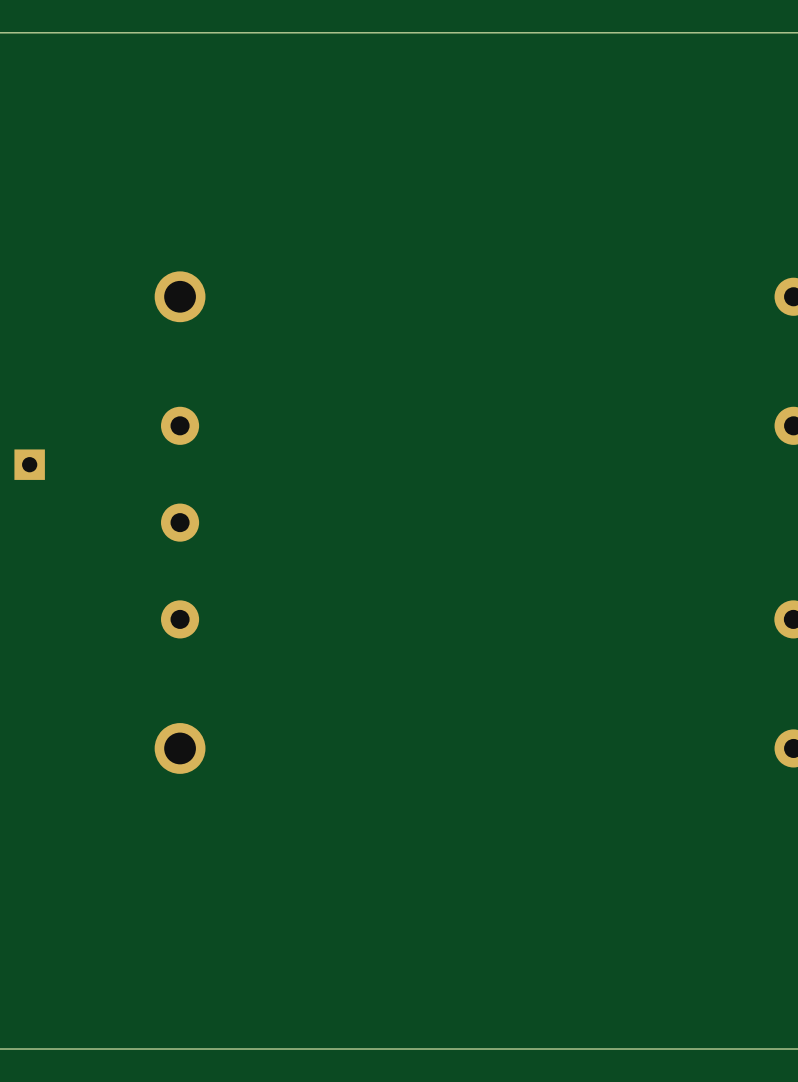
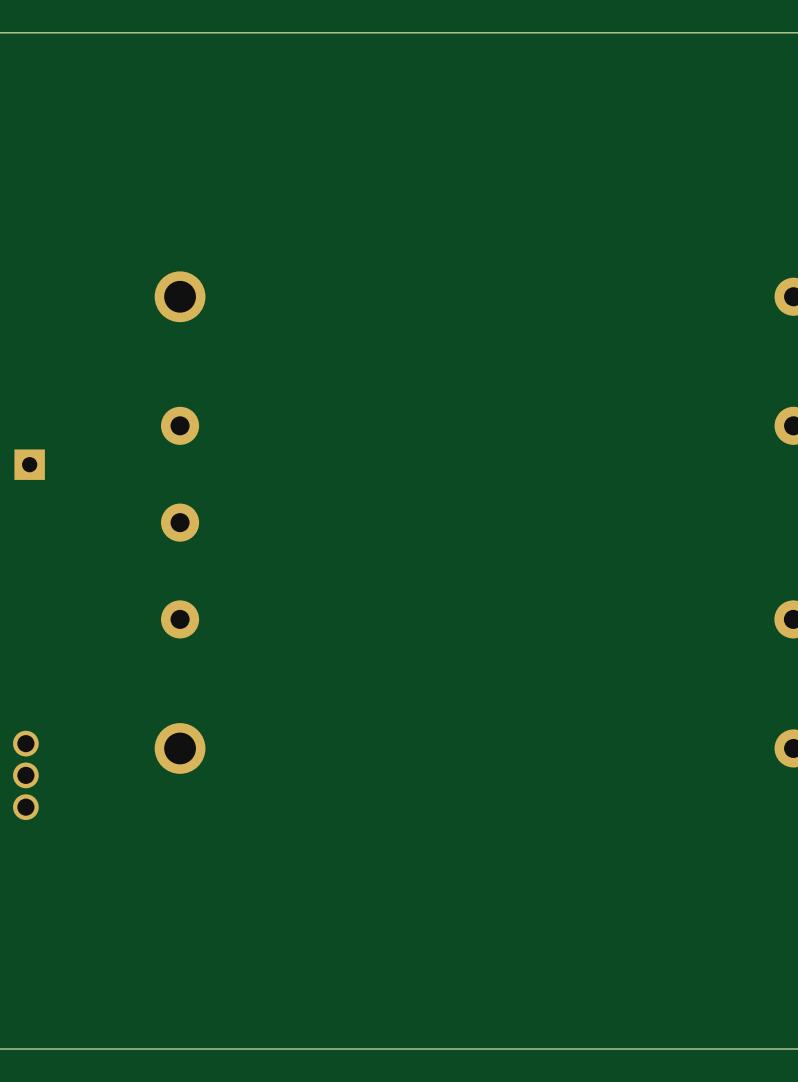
part: none -> (25, 775)

